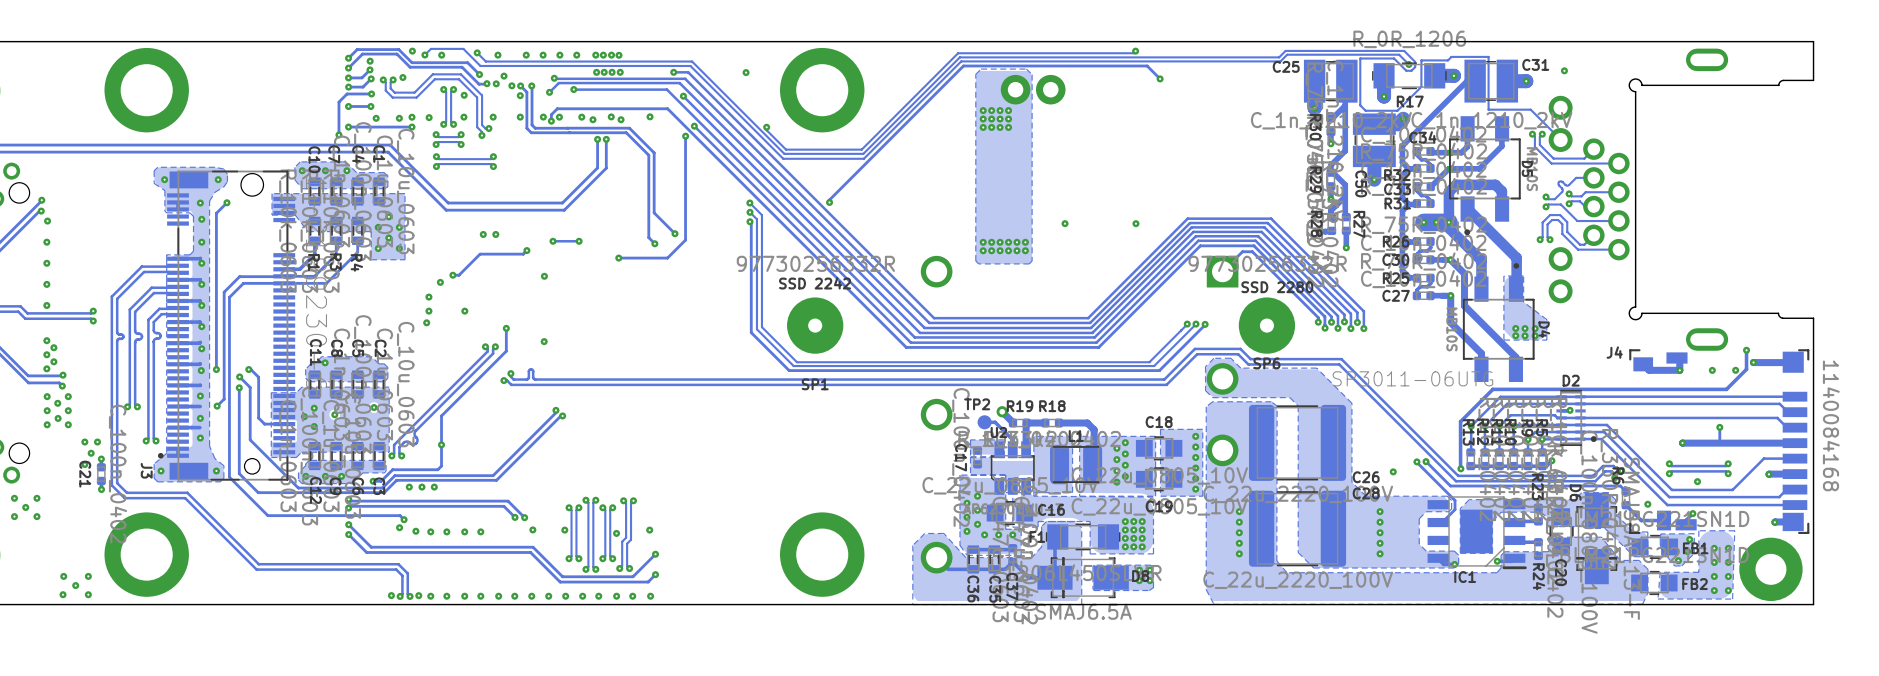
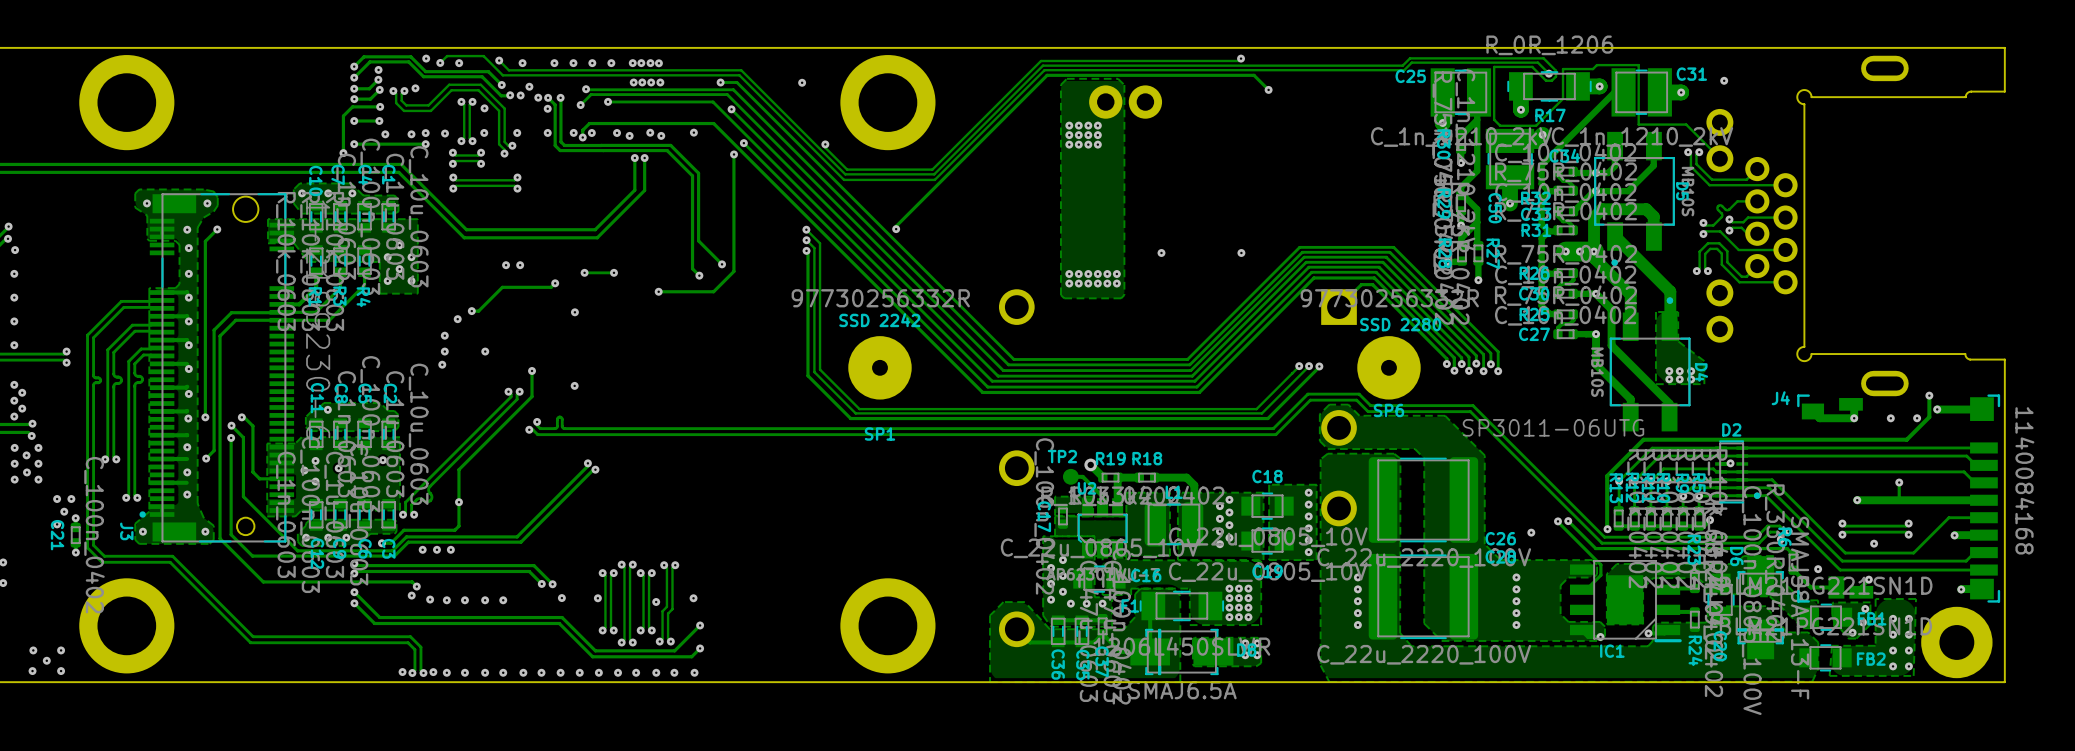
L1 footprint: [1050, 444, 1103, 485] -> [1144, 502, 1204, 547]

